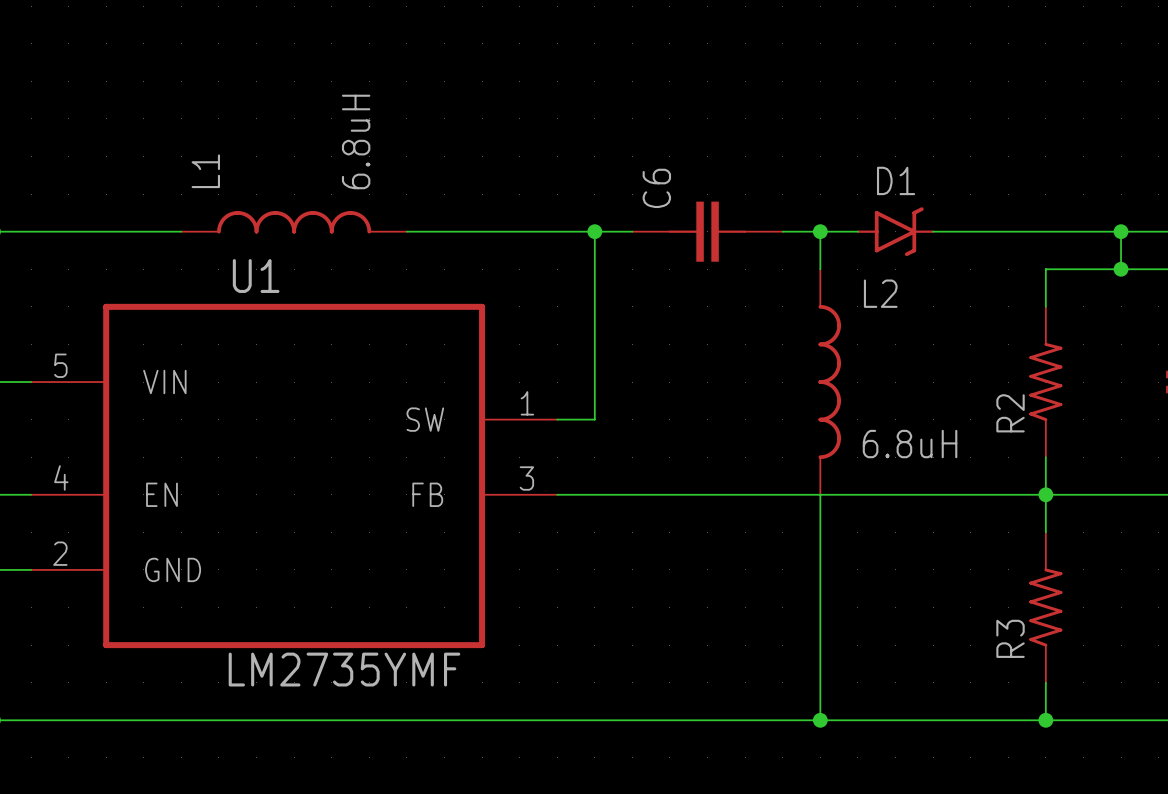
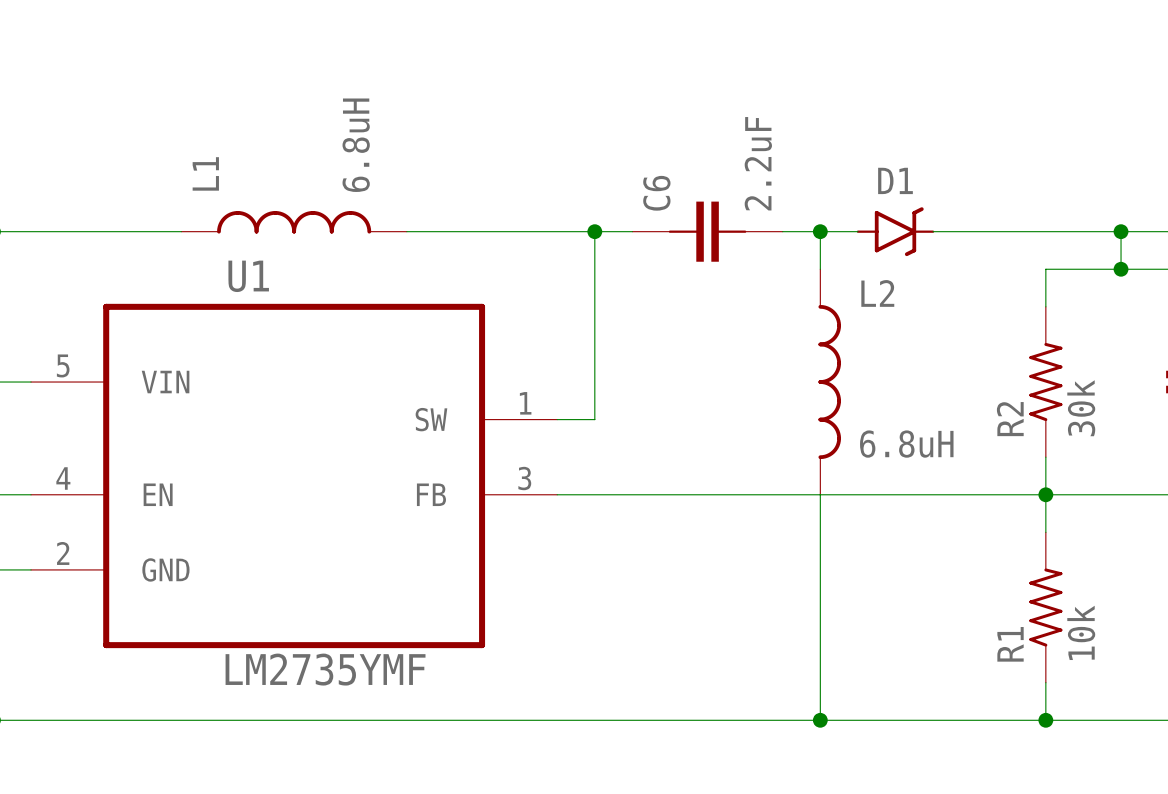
C6 value: none -> 2.2uF (758, 163)
R2 value: none -> 30k (1081, 408)
R3 value: none -> 10k (1081, 632)
R3 name: R3 (1010, 638) -> R1 (1010, 644)

